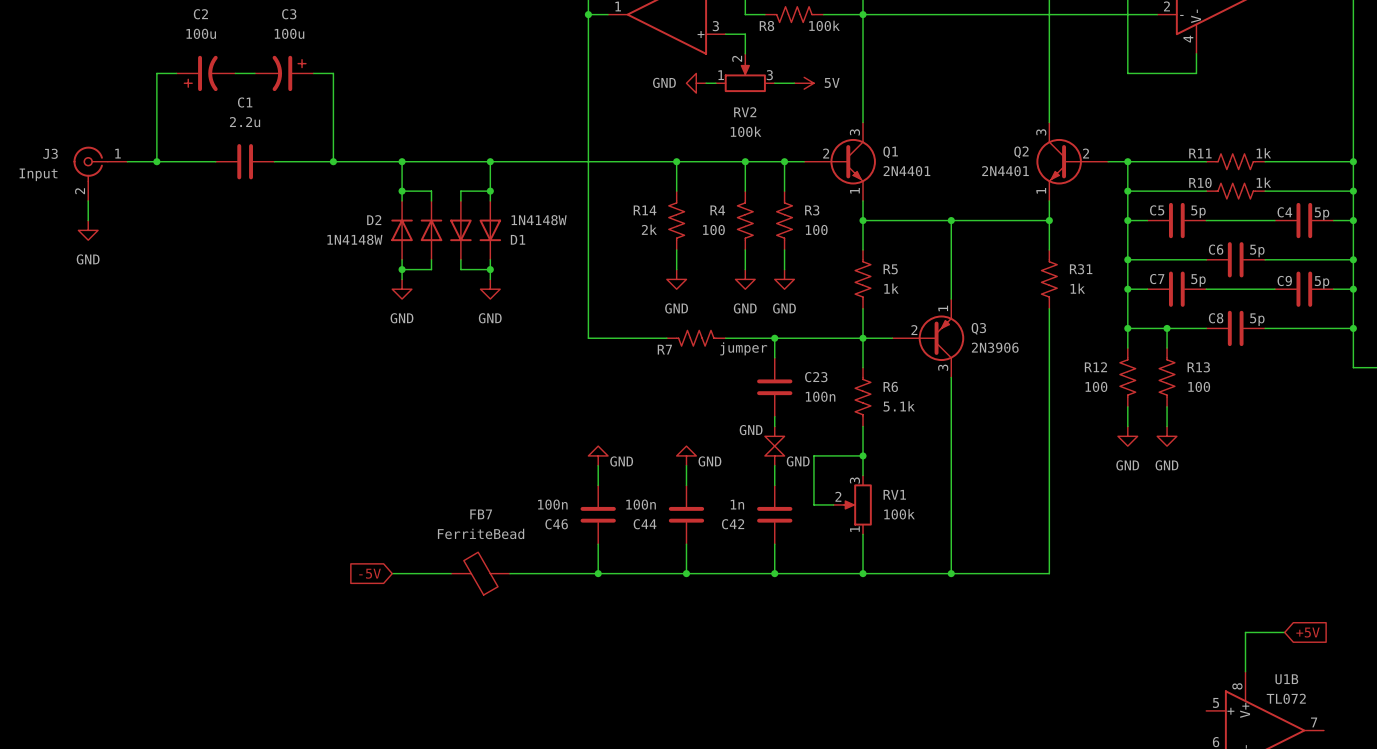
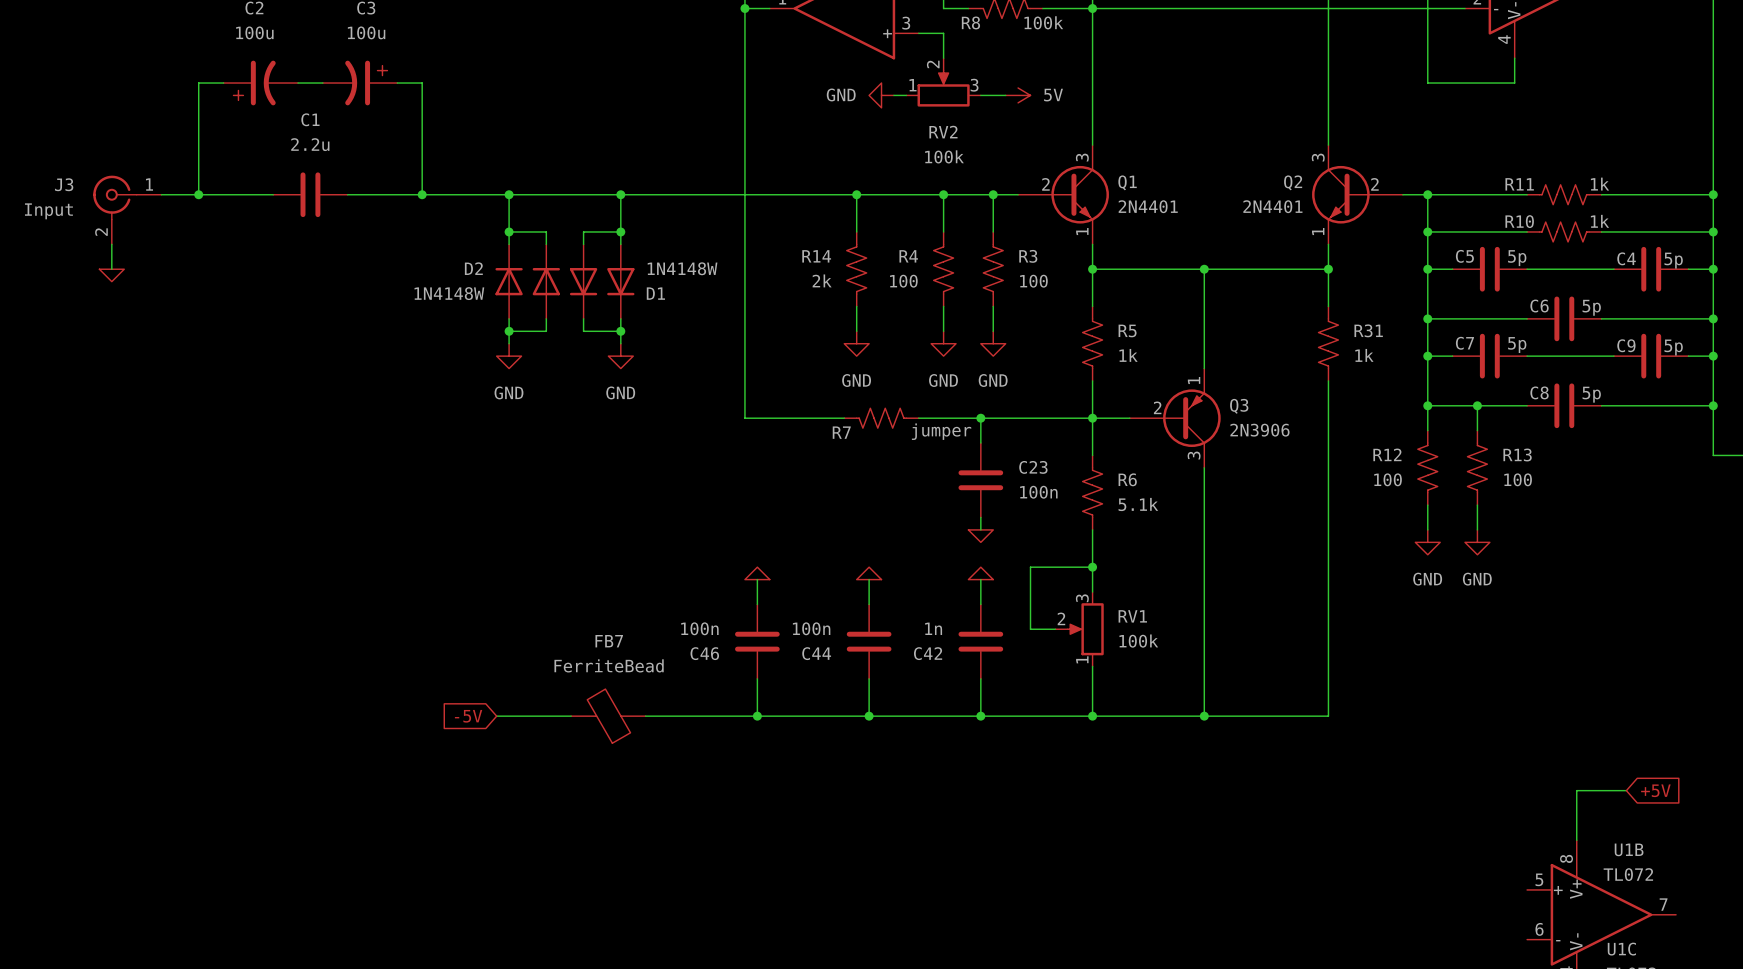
power symbol shape: [78, 220, 99, 241] -> [99, 269, 125, 282]
power symbol text: GND (88, 259) -> none
power symbol shape: [764, 426, 785, 447] -> [968, 529, 994, 543]
power symbol text: GND (751, 430) -> none
power symbol shape: [588, 446, 609, 466] -> [744, 567, 770, 580]
power symbol shape: [676, 446, 697, 466] -> [856, 567, 882, 580]
power symbol shape: [764, 446, 785, 466] -> [968, 567, 994, 580]
power symbol text: GND (621, 461) -> none
power symbol text: GND (709, 461) -> none
power symbol text: GND (798, 461) -> none

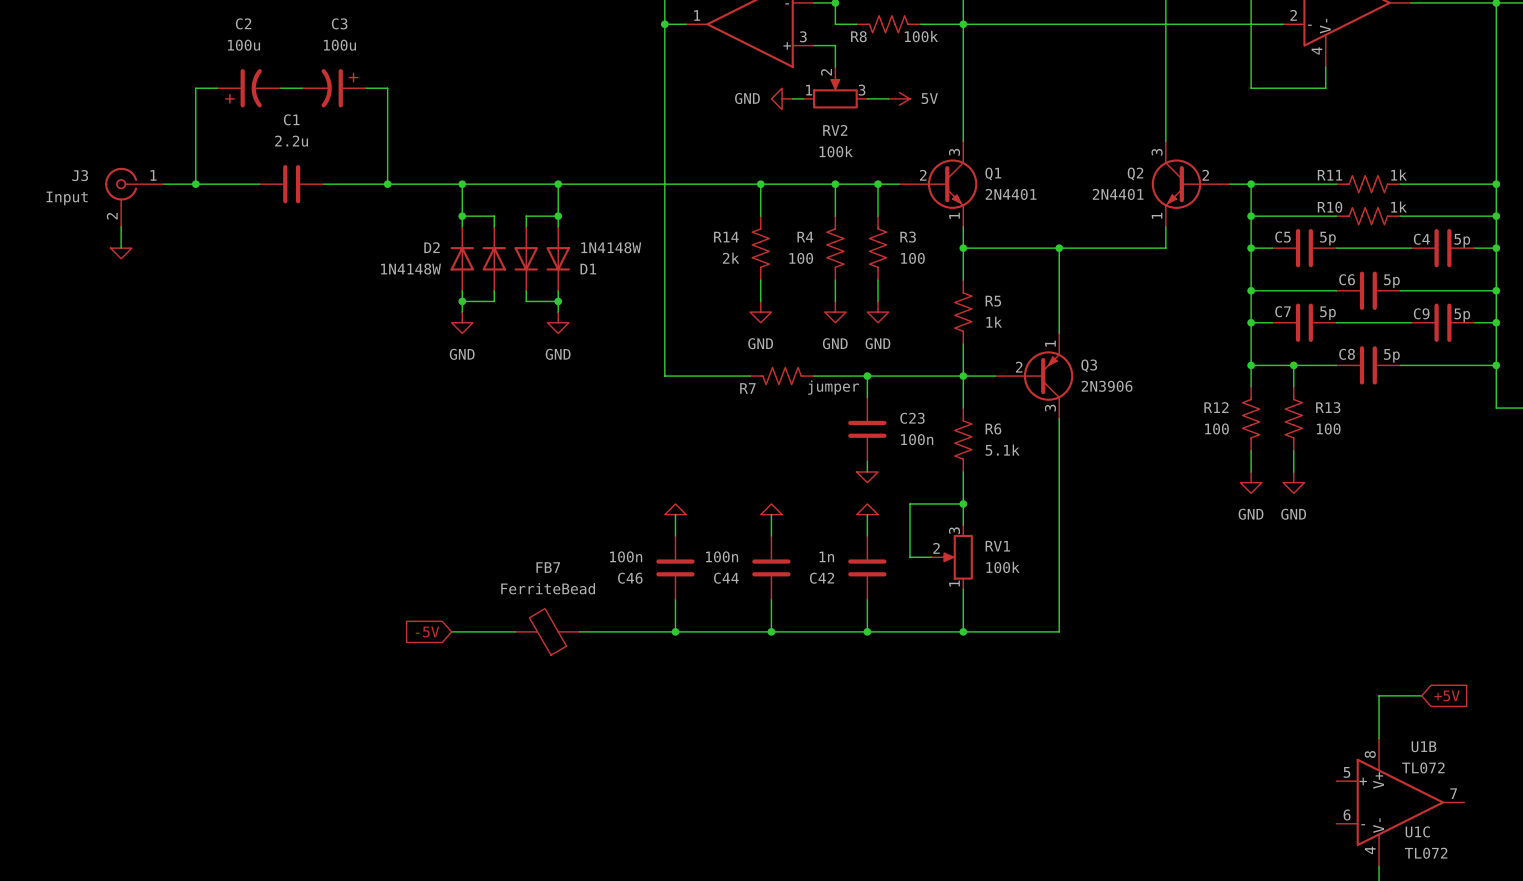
wire: (1328, 269) (1328, 306) -> none
junction: (1328, 269) -> none
R31: 1k (1328, 343) -> none
wire: (1328, 380) (1328, 716) (1204, 716) -> none
junction: (1204, 716) -> none

